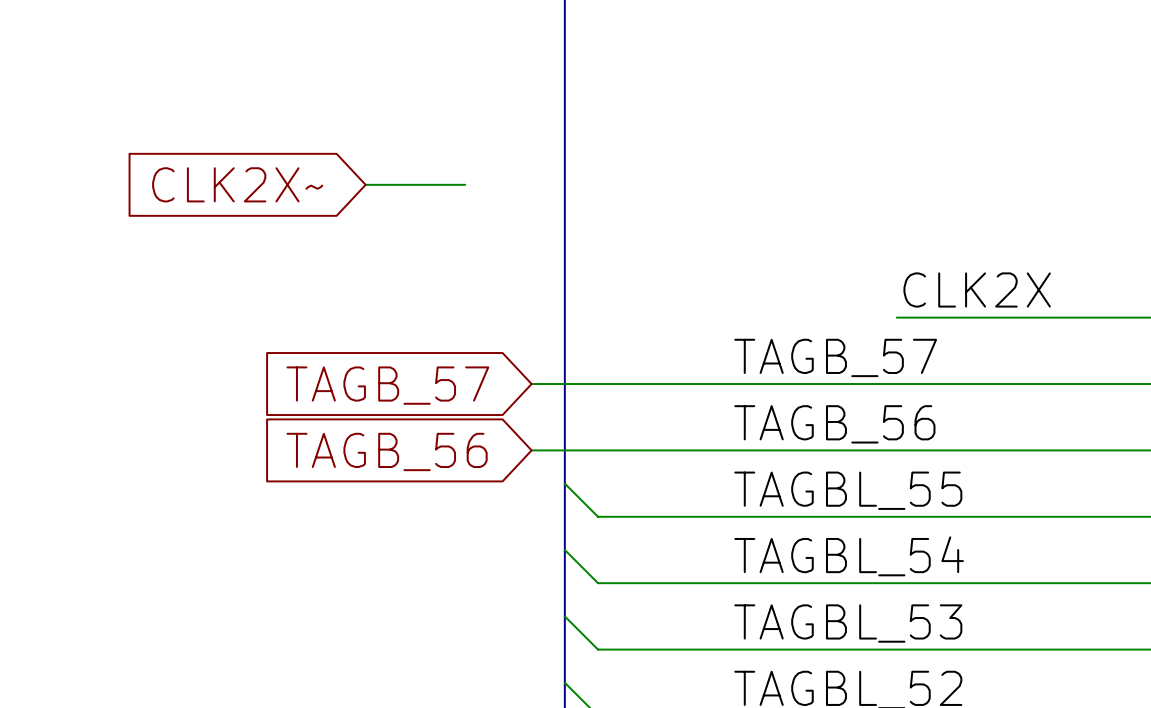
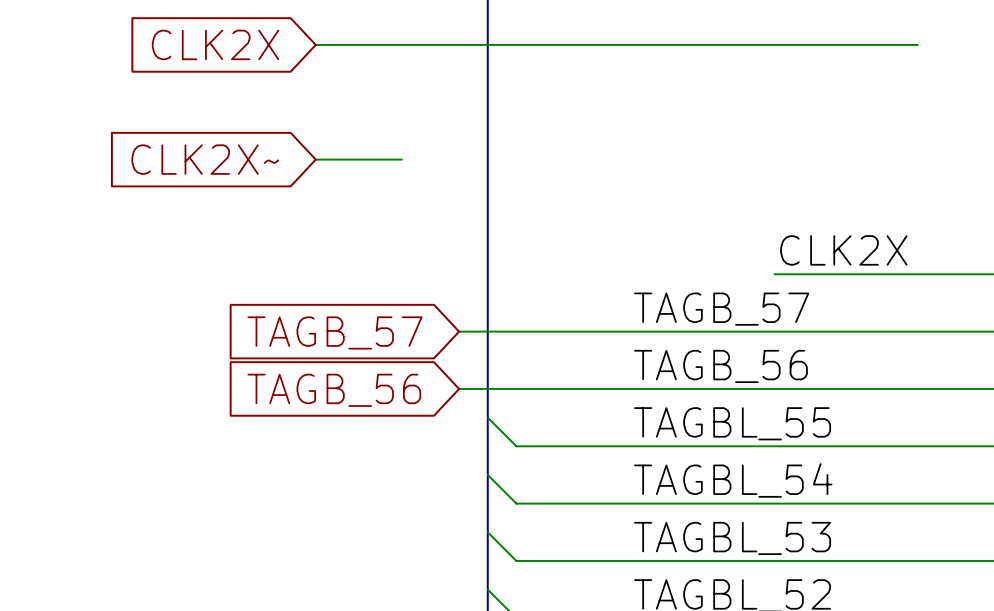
global label: none -> CLK2X (215, 44)
wire: none -> (315, 44) (917, 44)

